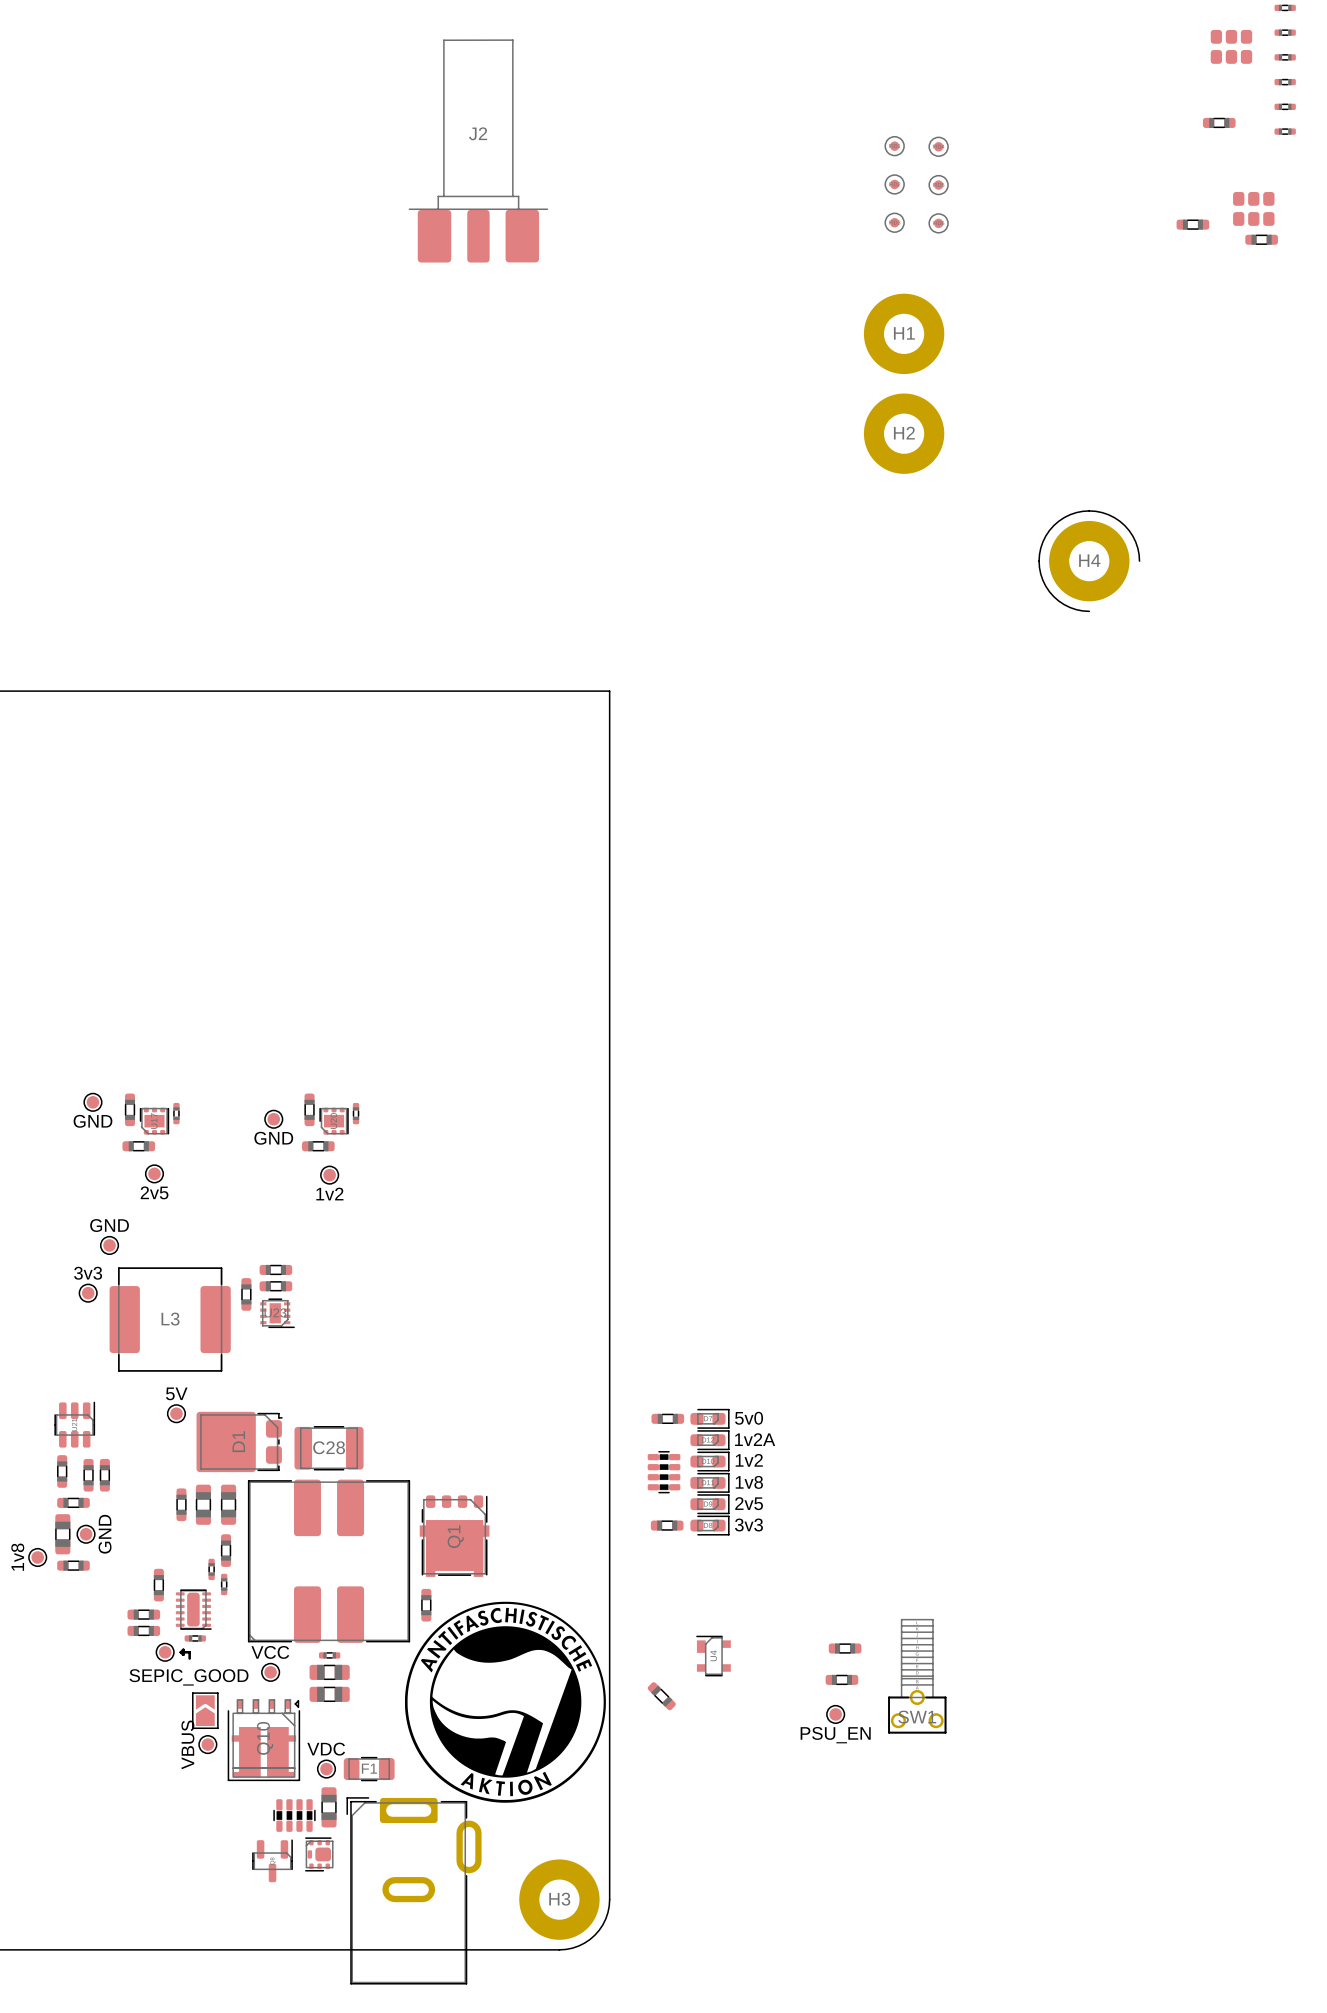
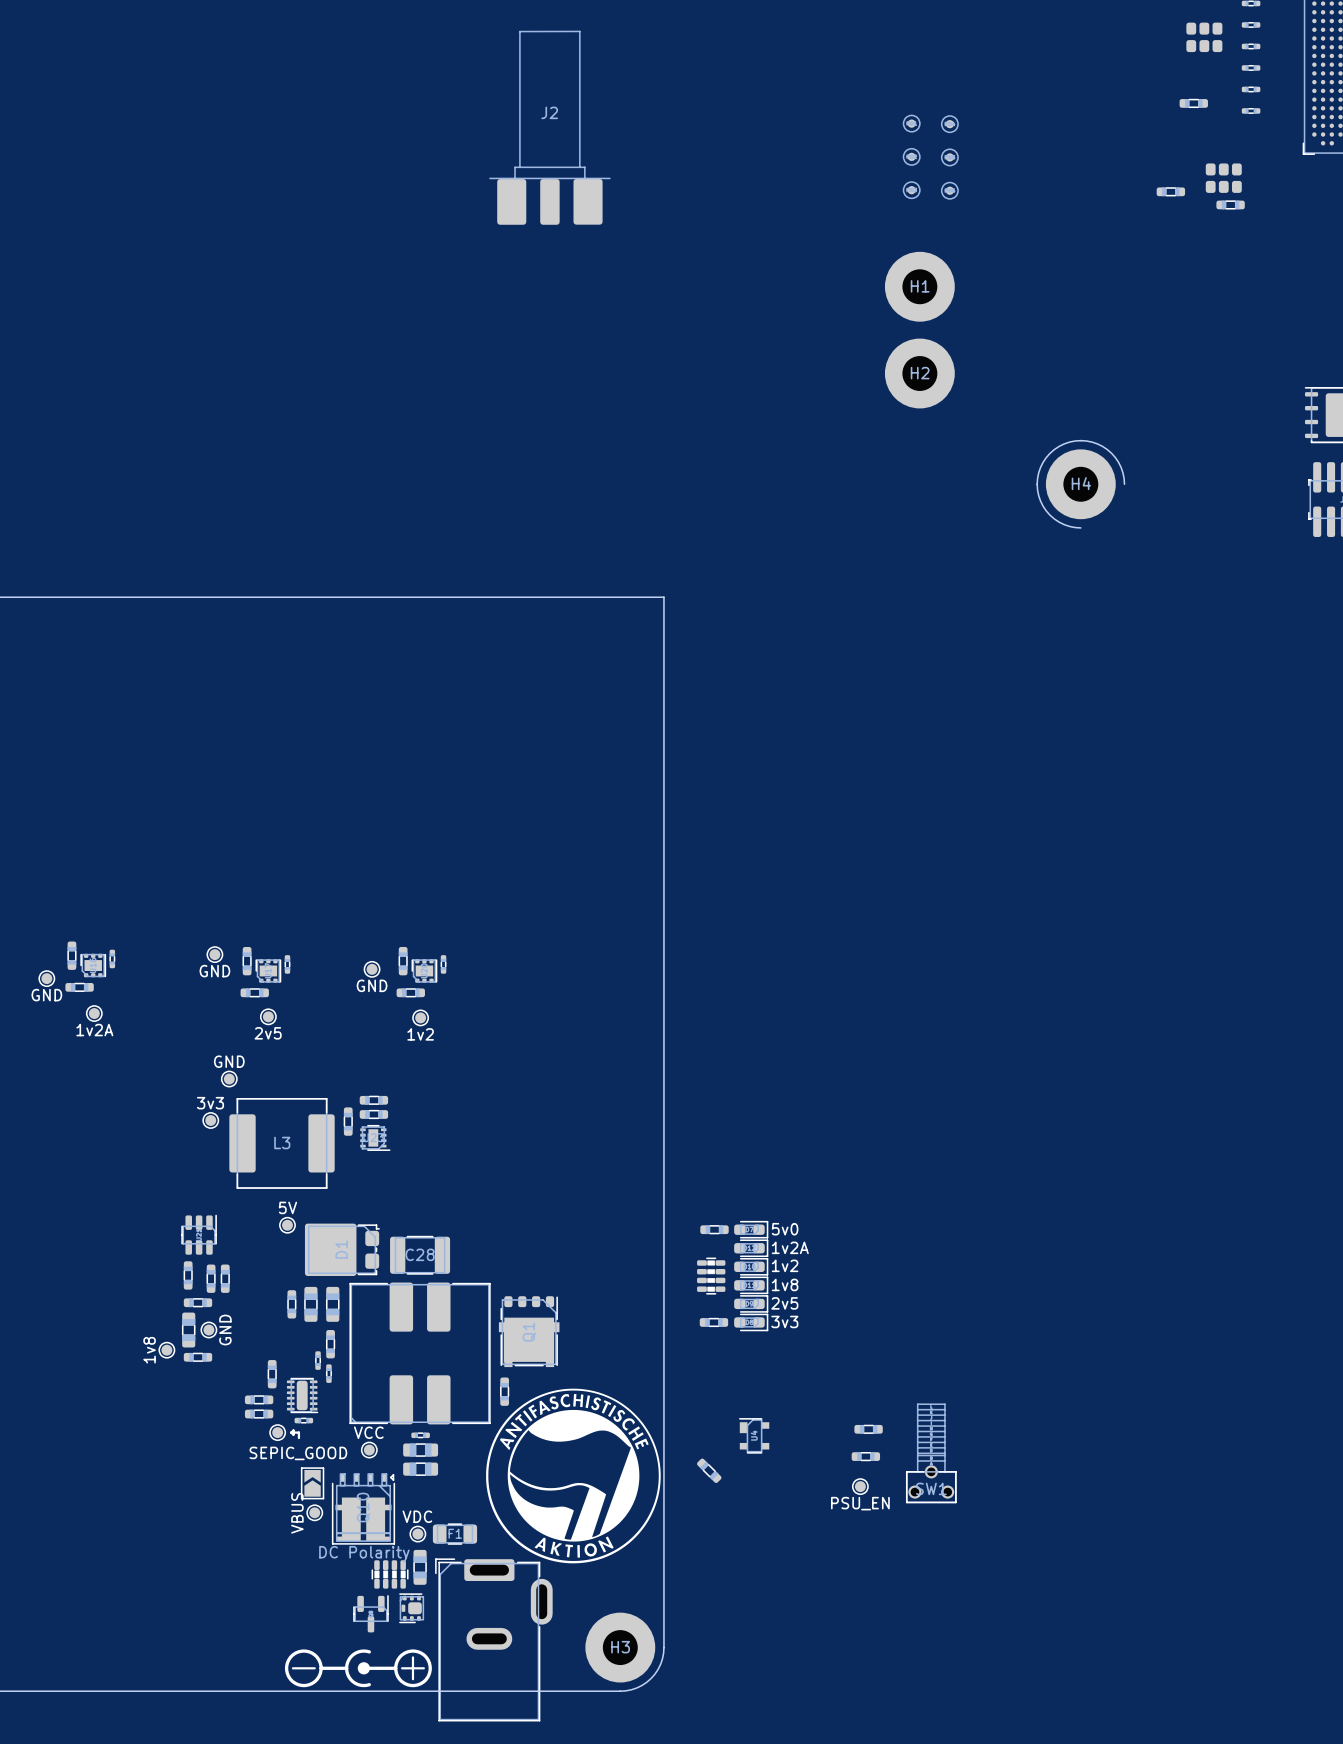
drawing: none -> [284, 1649, 432, 1688]

